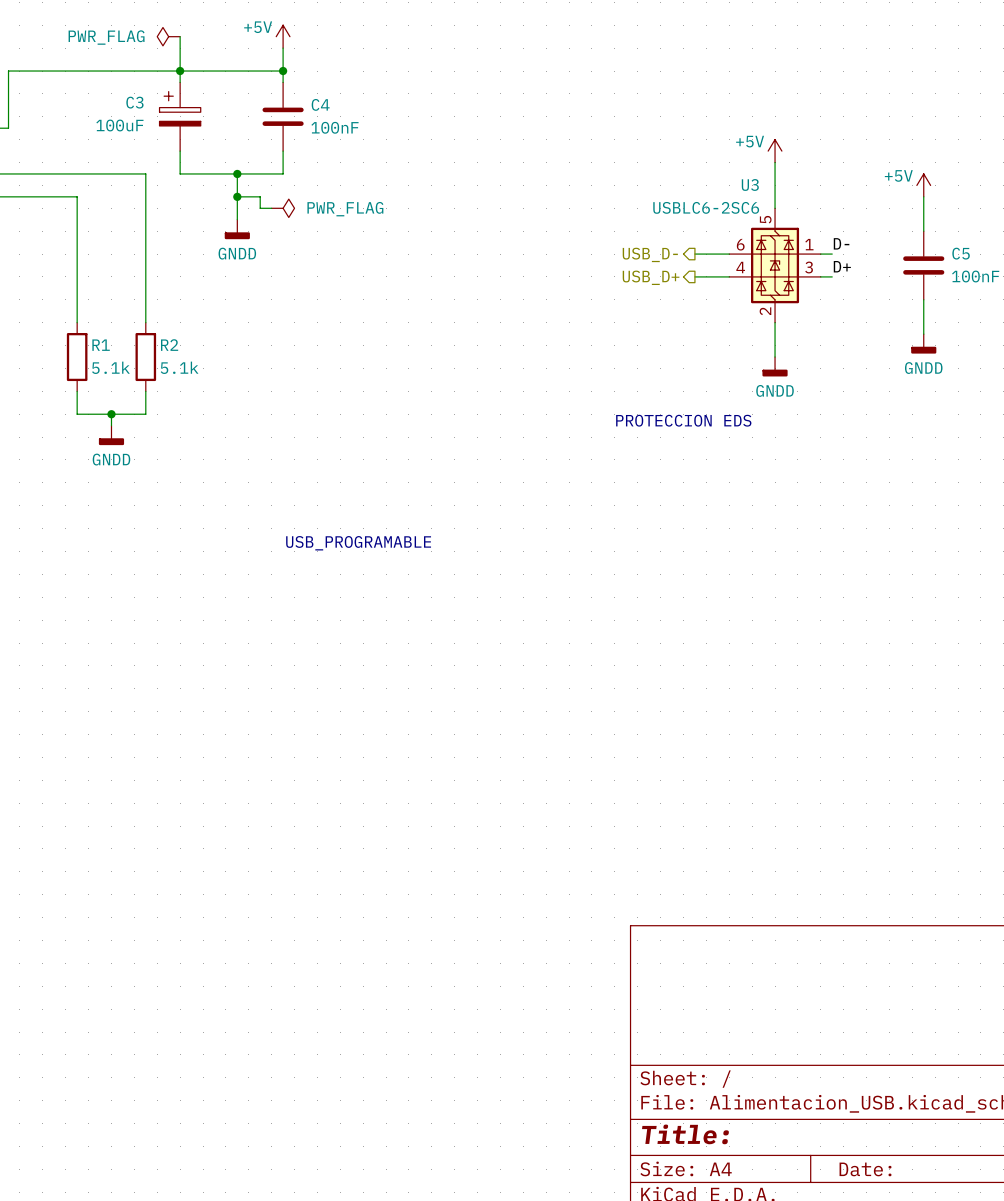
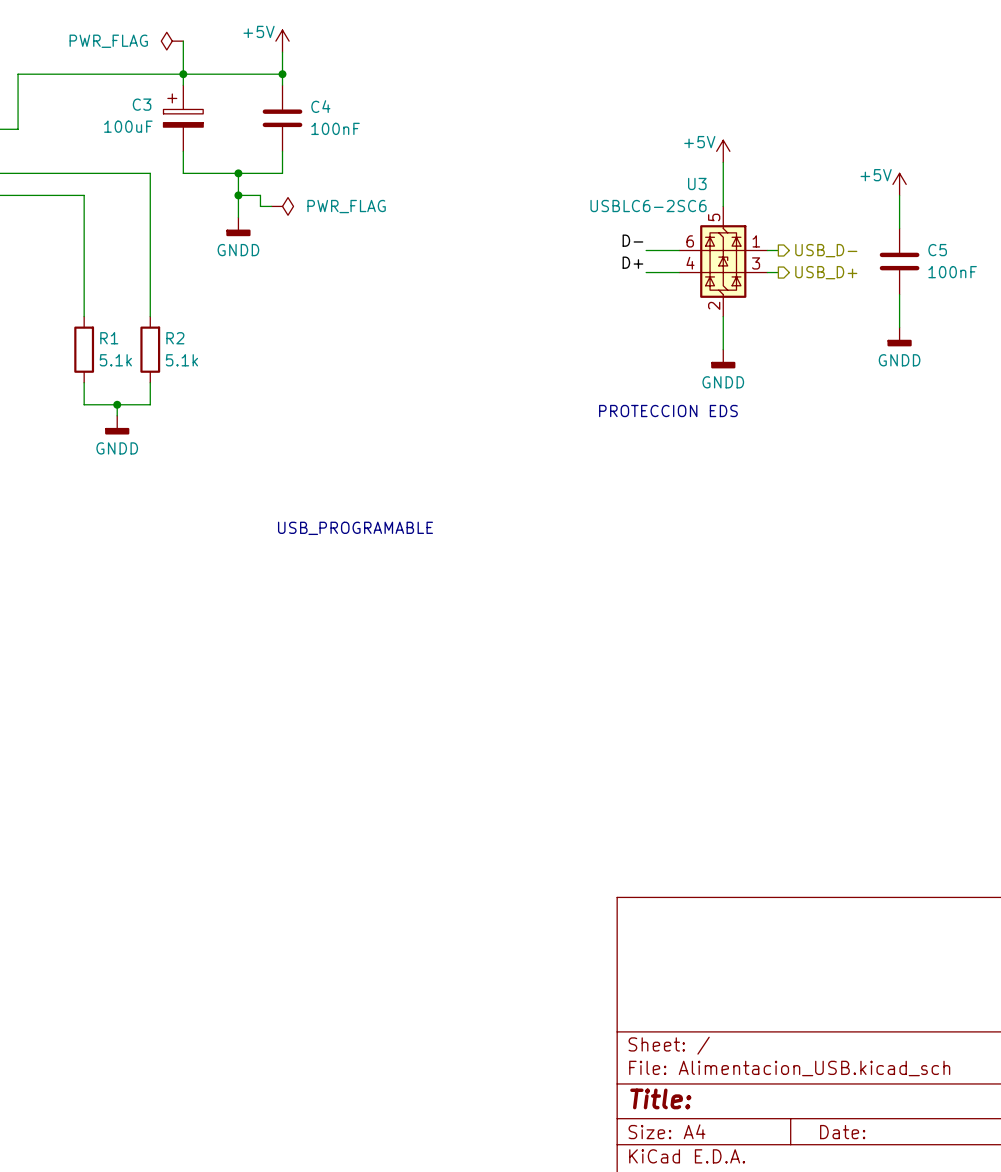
power symbol position: +5V (775, 151) -> +5V (723, 151)
wire: (775, 162) (775, 208) -> (723, 162) (723, 206)
label position: D- (841, 243) -> D- (632, 240)
hierarchical label rotation: 0° (650, 254) -> 180° (826, 250)
hierarchical label position: USB_D- (650, 254) -> USB_D- (826, 250)
U3 position: (775, 265) -> (723, 261)
label position: D+ (842, 266) -> D+ (632, 262)
hierarchical label rotation: 0° (651, 277) -> 180° (826, 272)
hierarchical label position: USB_D+ (651, 277) -> USB_D+ (826, 272)
wire: (775, 322) (775, 357) -> (723, 316) (723, 349)
power symbol position: GNDD (775, 366) -> GNDD (723, 359)

